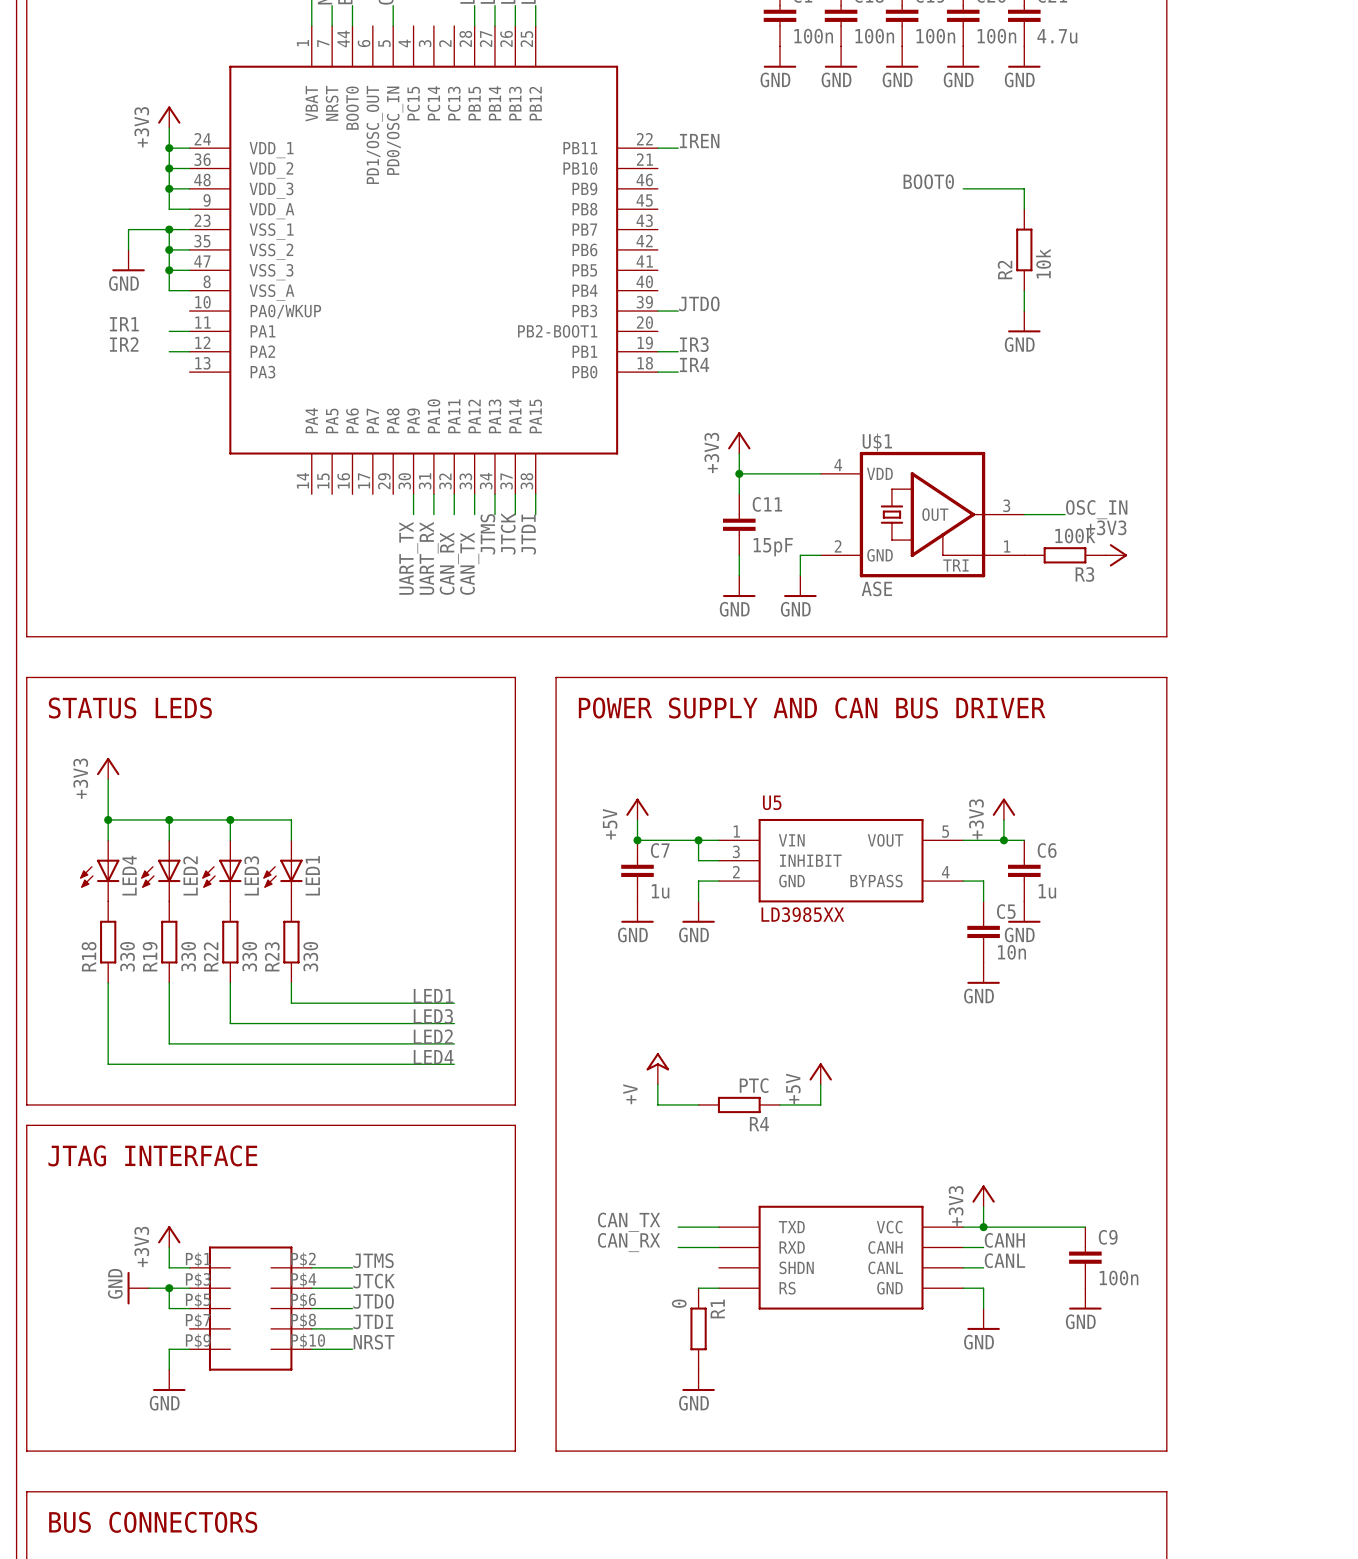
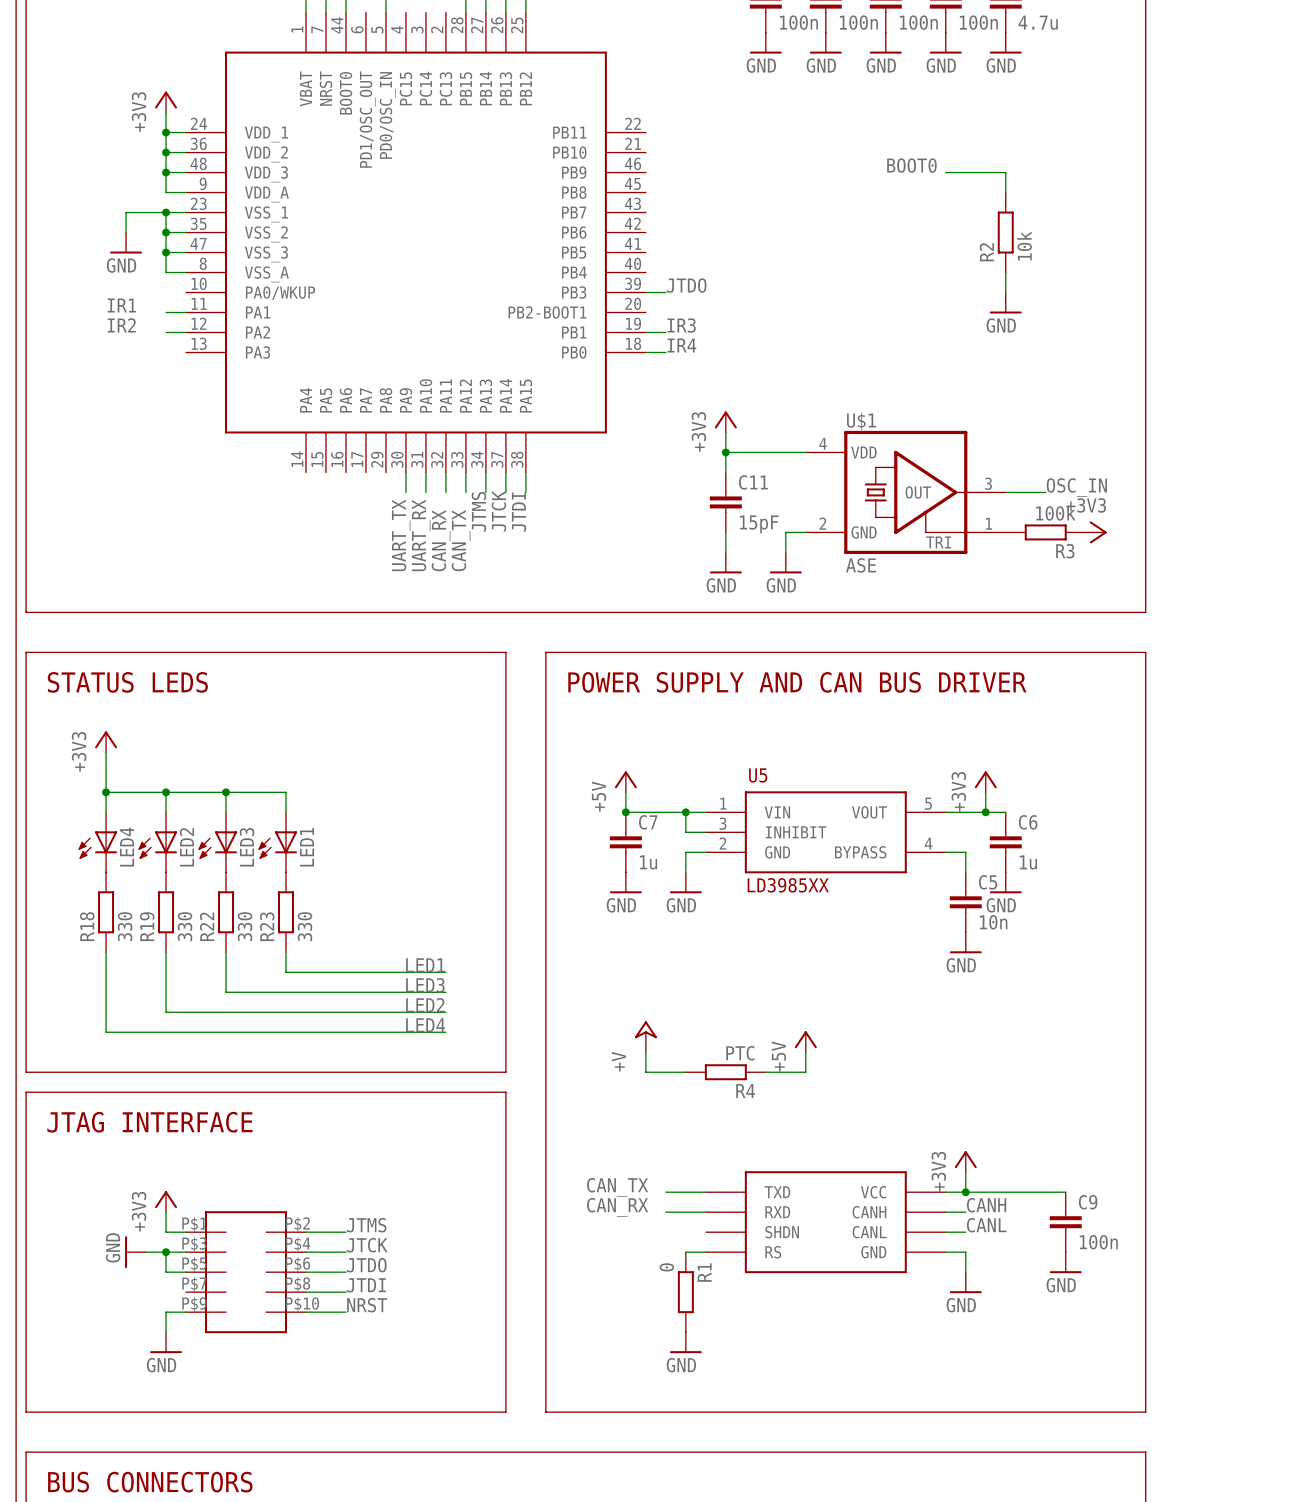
label: IREN (699, 141) -> none
wire: (657, 148) (678, 148) -> none

